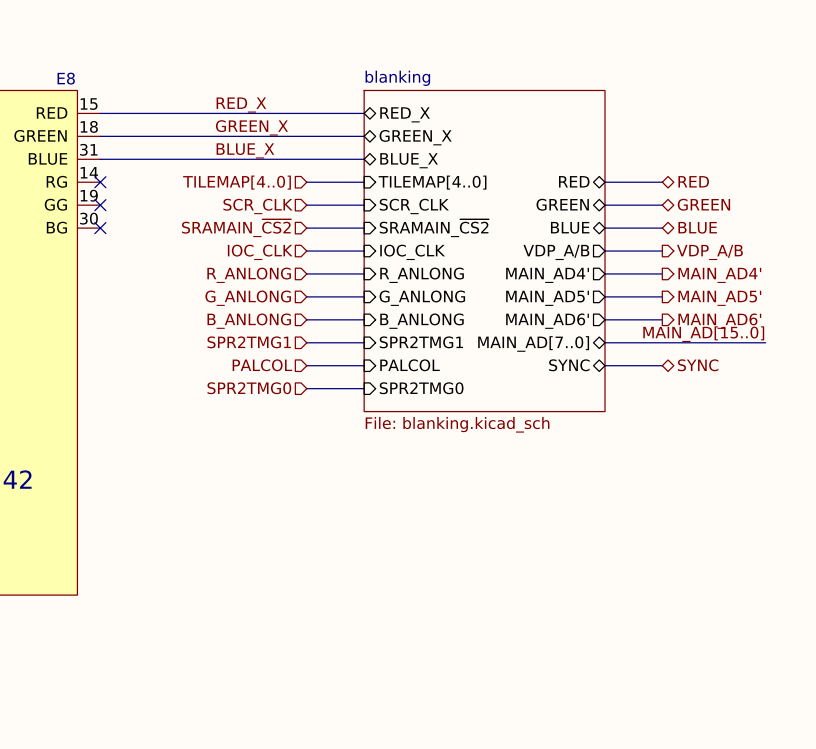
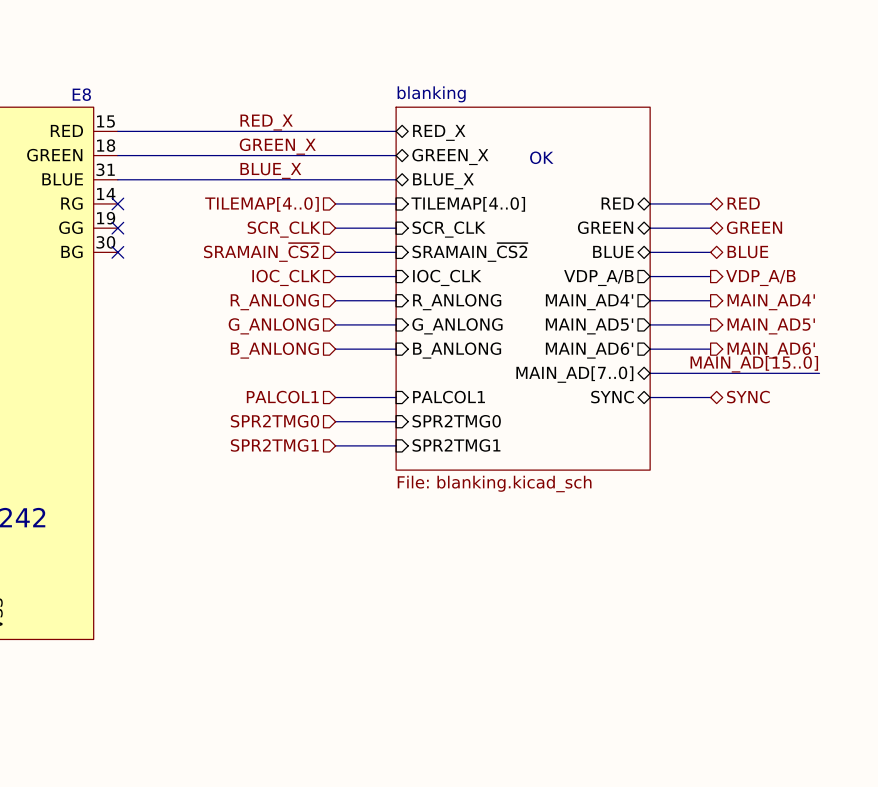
text: none -> OK (541, 157)
sheet blanking: File: blanking.kicad_sch (484, 251) -> none
sheet blanking: none -> File: blanking.kicad_sch (523, 288)
hierarchical label position: SPR2TMG1 (249, 342) -> SPR2TMG1 (274, 445)
wire: (306, 342) (364, 342) -> (335, 445) (396, 445)
sheet pin position: SPR2TMG1 (421, 342) -> SPR2TMG1 (456, 445)
hierarchical label: PALCOL (262, 365) -> PALCOL1 (282, 397)
sheet pin: PALCOL (410, 365) -> PALCOL1 (449, 397)

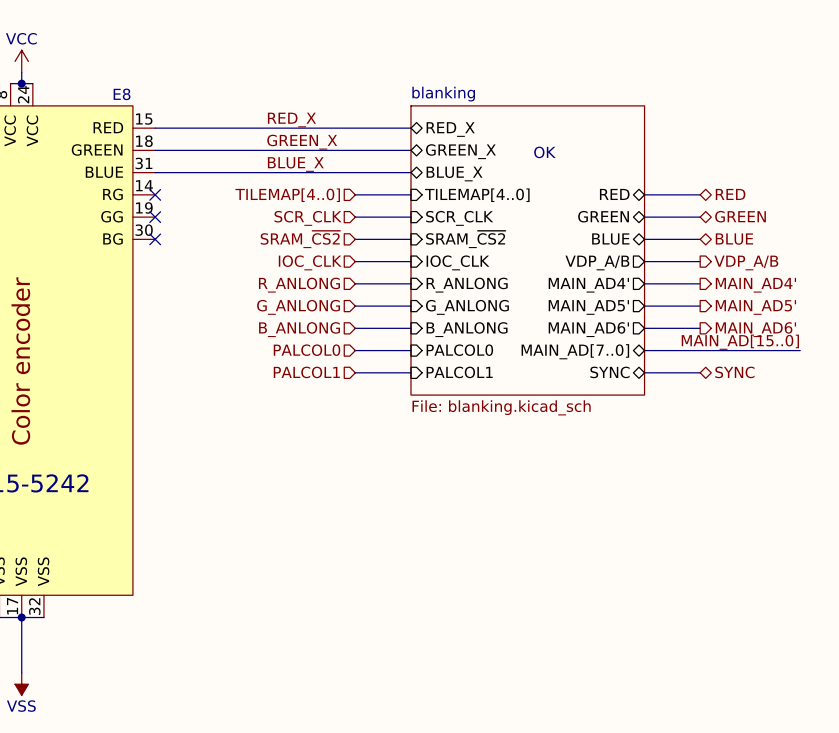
hierarchical label: SRAMAIN_~{CS2} (261, 252) -> SRAM_~{CS2} (300, 239)
sheet pin: SRAMAIN_~{CS2} (470, 252) -> SRAM_~{CS2} (465, 239)
sheet blanking: none -> File: blanking.kicad_sch (527, 250)
sheet blanking: File: blanking.kicad_sch (523, 288) -> none
hierarchical label: none -> PALCOL0 (307, 350)
sheet pin: none -> PALCOL0 (459, 350)
hierarchical label: SPR2TMG0 (275, 421) -> none
wire: (335, 421) (396, 421) -> (355, 350) (410, 350)
sheet pin: SPR2TMG0 (456, 421) -> none
hierarchical label: SPR2TMG1 (274, 445) -> none
wire: (335, 445) (396, 445) -> none
sheet pin: SPR2TMG1 (456, 445) -> none

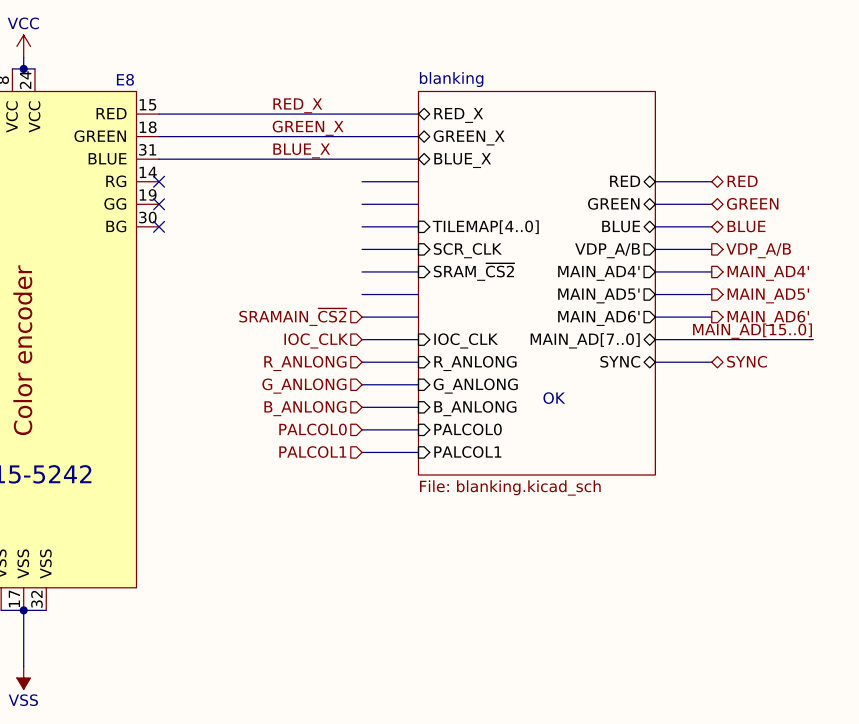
text: OK (544, 152) -> none
bus: (355, 194) (410, 194) -> none
hierarchical label: TILEMAP[4..0] (287, 195) -> none
sheet pin: TILEMAP[4..0] (477, 195) -> none
hierarchical label: SCR_CLK (308, 218) -> none
sheet pin: SCR_CLK (459, 218) -> none
hierarchical label: SRAM_~{CS2} (300, 239) -> none
sheet pin: SRAM_~{CS2} (465, 239) -> TILEMAP[4..0] (485, 227)
sheet blanking: File: blanking.kicad_sch (527, 250) -> none
hierarchical label: IOC_CLK (310, 262) -> none
sheet pin: IOC_CLK (458, 262) -> SCR_CLK (467, 250)
hierarchical label: R_ANLONG (299, 285) -> none
sheet pin: R_ANLONG (467, 285) -> SRAM_~{CS2} (474, 272)
sheet blanking: none -> File: blanking.kicad_sch (536, 283)
hierarchical label position: G_ANLONG (298, 307) -> G_ANLONG (304, 386)
sheet pin position: G_ANLONG (467, 307) -> G_ANLONG (475, 386)
hierarchical label: B_ANLONG (299, 329) -> SRAMAIN_~{CS2} (293, 317)
sheet pin position: B_ANLONG (467, 329) -> B_ANLONG (475, 408)
hierarchical label: PALCOL0 (307, 350) -> IOC_CLK (316, 340)
sheet pin: PALCOL0 (459, 350) -> IOC_CLK (466, 340)
hierarchical label: PALCOL1 (306, 372) -> R_ANLONG (305, 363)
sheet pin: PALCOL1 (459, 372) -> R_ANLONG (475, 363)
wire: none -> (362, 384) (418, 384)
text: none -> OK (554, 398)
wire: none -> (362, 407) (418, 407)
hierarchical label: none -> B_ANLONG (305, 408)
hierarchical label: none -> PALCOL0 (313, 429)
wire: none -> (362, 429) (418, 429)
sheet pin: none -> PALCOL0 (468, 429)
hierarchical label: none -> PALCOL1 (312, 452)
wire: none -> (362, 452) (418, 452)
sheet pin: none -> PALCOL1 (467, 452)

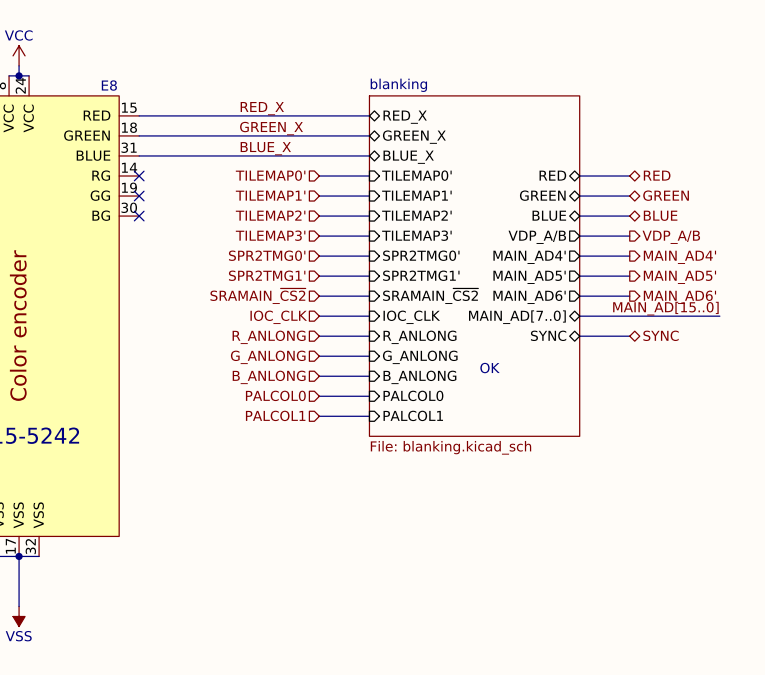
hierarchical label: none -> TILEMAP0' (270, 175)
sheet pin: none -> TILEMAP0' (416, 175)
hierarchical label: none -> TILEMAP1' (270, 195)
sheet pin: none -> TILEMAP1' (416, 195)
hierarchical label: none -> TILEMAP2' (270, 215)
sheet pin: TILEMAP[4..0] (485, 227) -> TILEMAP2' (416, 215)
hierarchical label: none -> TILEMAP3' (270, 235)
sheet pin: SCR_CLK (467, 250) -> TILEMAP3' (416, 235)
hierarchical label: none -> SPR2TMG0' (267, 255)
sheet pin: SRAM_~{CS2} (474, 272) -> SPR2TMG0' (421, 255)
hierarchical label: none -> SPR2TMG1' (267, 275)
sheet pin: none -> SPR2TMG1' (421, 275)
sheet pin: none -> SRAMAIN_~{CS2} (430, 296)

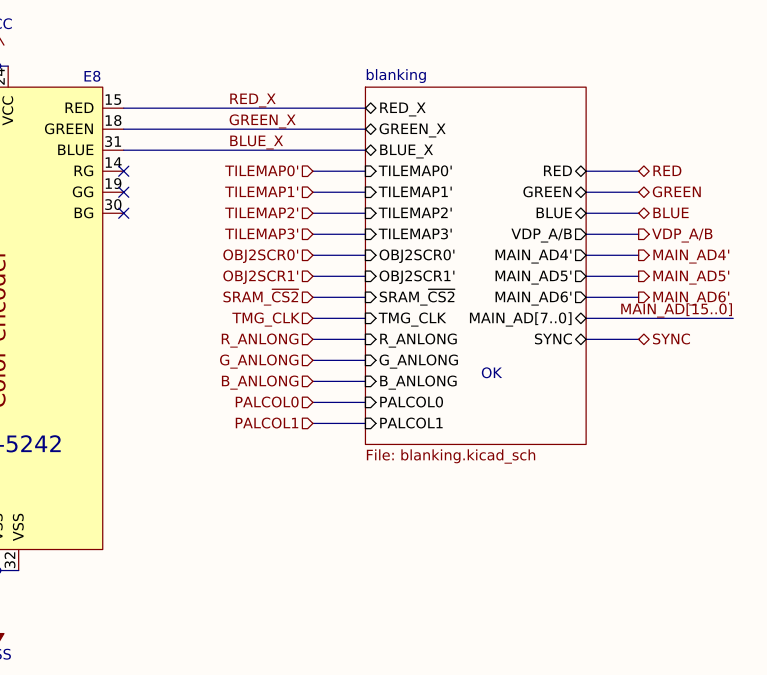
hierarchical label: SPR2TMG0' (267, 255) -> OBJ2SCR0' (260, 256)
sheet pin: SPR2TMG0' (421, 255) -> OBJ2SCR0' (417, 256)
hierarchical label: SPR2TMG1' (267, 275) -> OBJ2SCR1' (260, 277)
sheet pin: SPR2TMG1' (421, 275) -> OBJ2SCR1' (417, 277)
hierarchical label: SRAMAIN_~{CS2} (258, 296) -> SRAM_~{CS2} (260, 297)
sheet pin: SRAMAIN_~{CS2} (430, 296) -> SRAM_~{CS2} (417, 297)
hierarchical label: IOC_CLK (278, 317) -> TMG_CLK (266, 319)
sheet pin: IOC_CLK (411, 317) -> TMG_CLK (412, 319)

